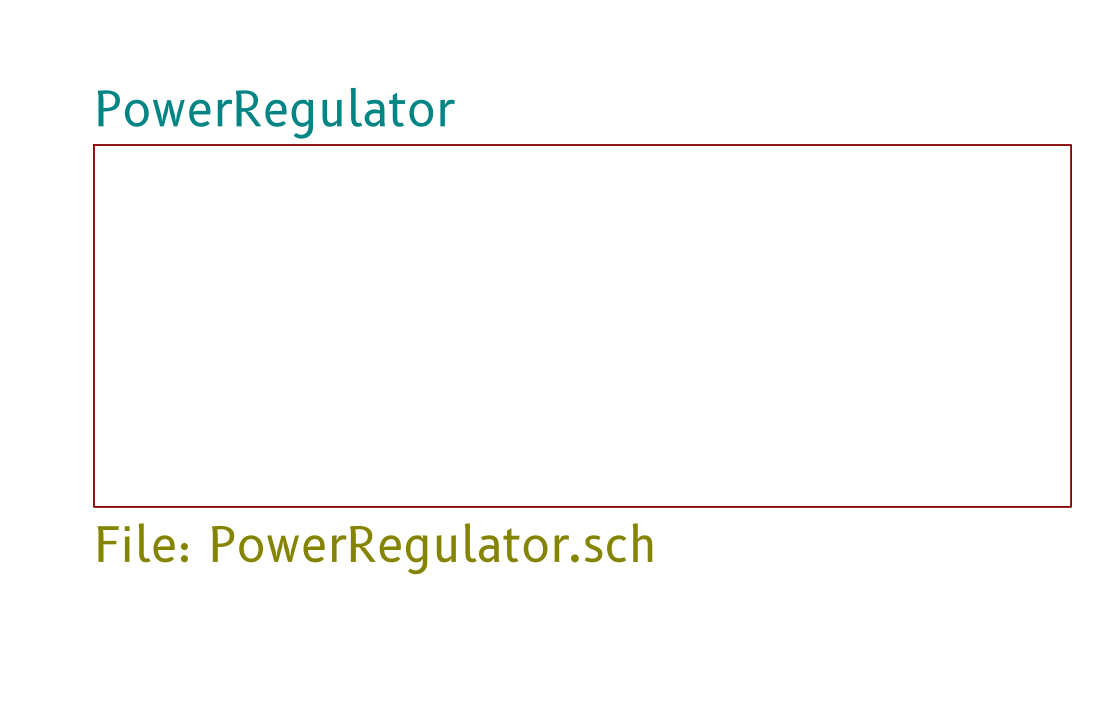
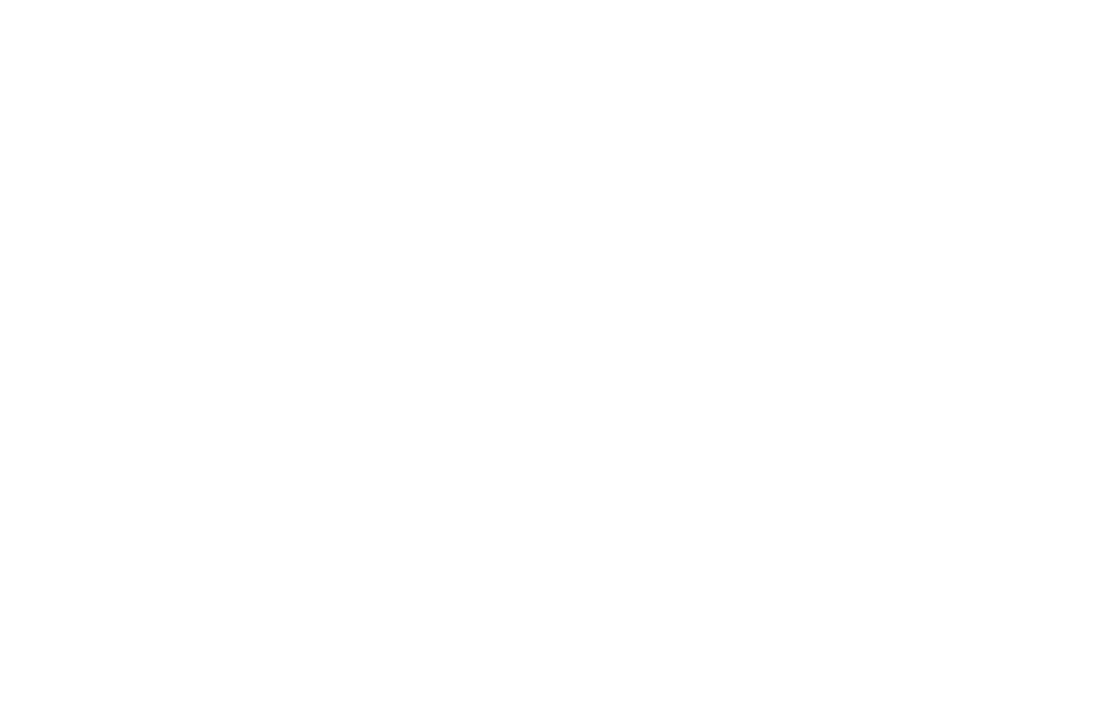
sheet PowerRegulator: File: PowerRegulator.sch (582, 325) -> none

